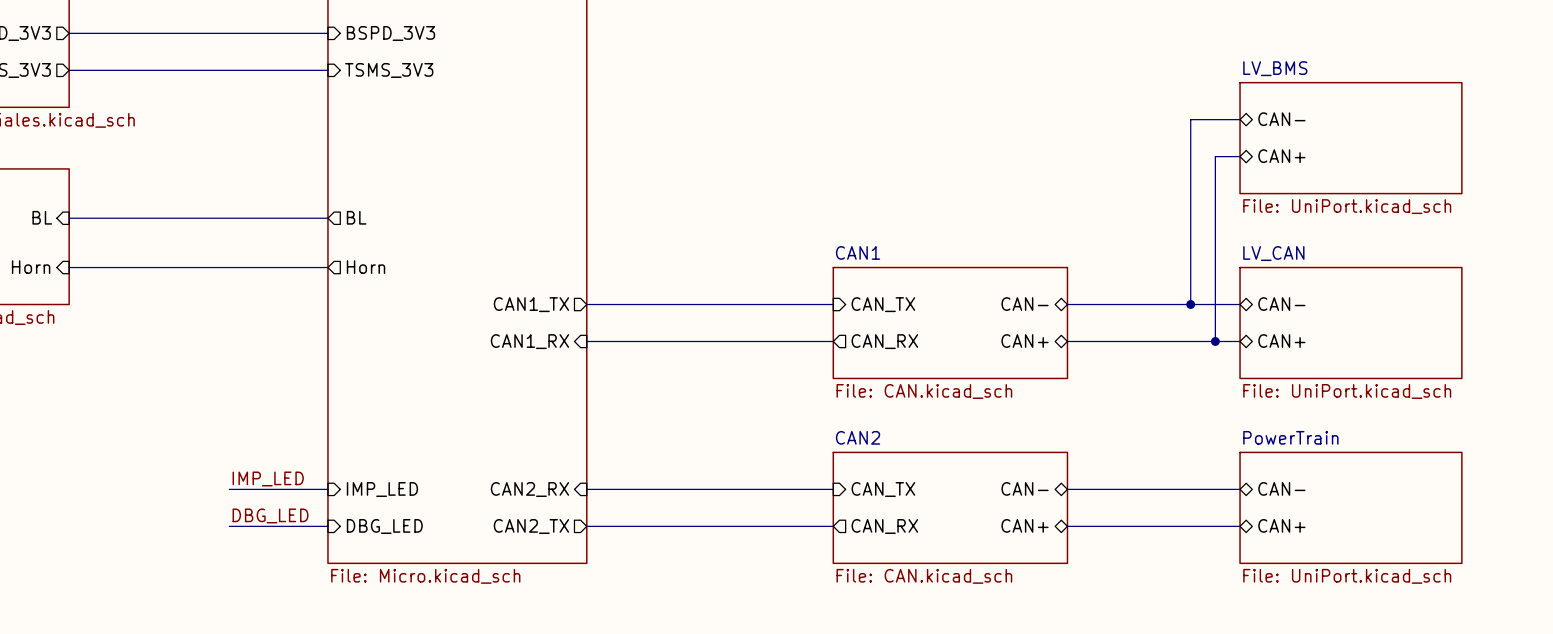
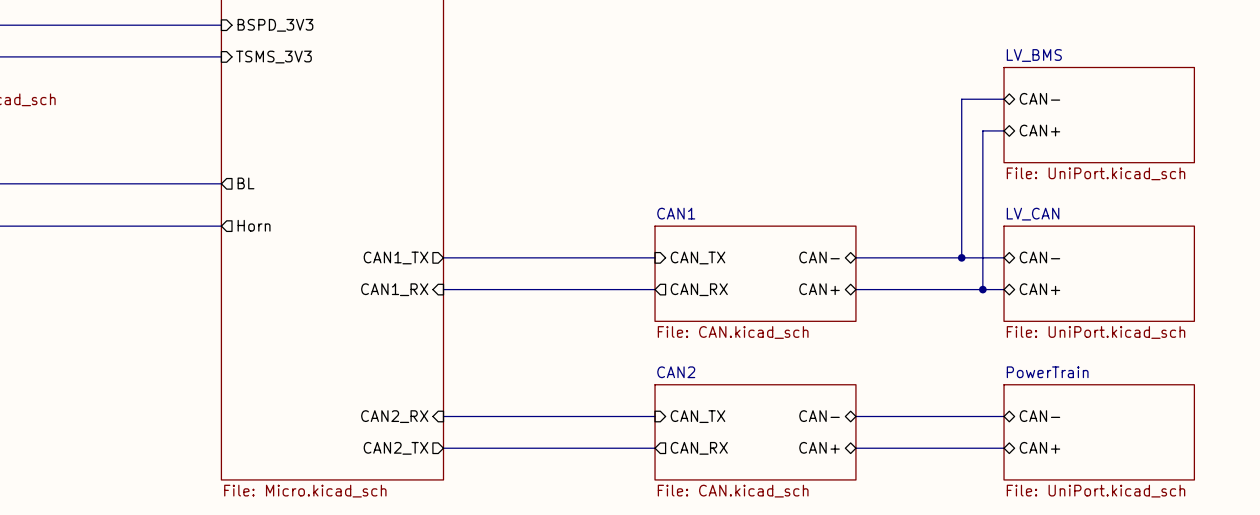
label: IMP_LED (268, 478) -> none
wire: (229, 489) (327, 489) -> none
sheet pin: IMP_LED (382, 489) -> none
label: DBG_LED (270, 515) -> none
wire: (229, 526) (327, 526) -> none
sheet pin: DBG_LED (384, 526) -> none

